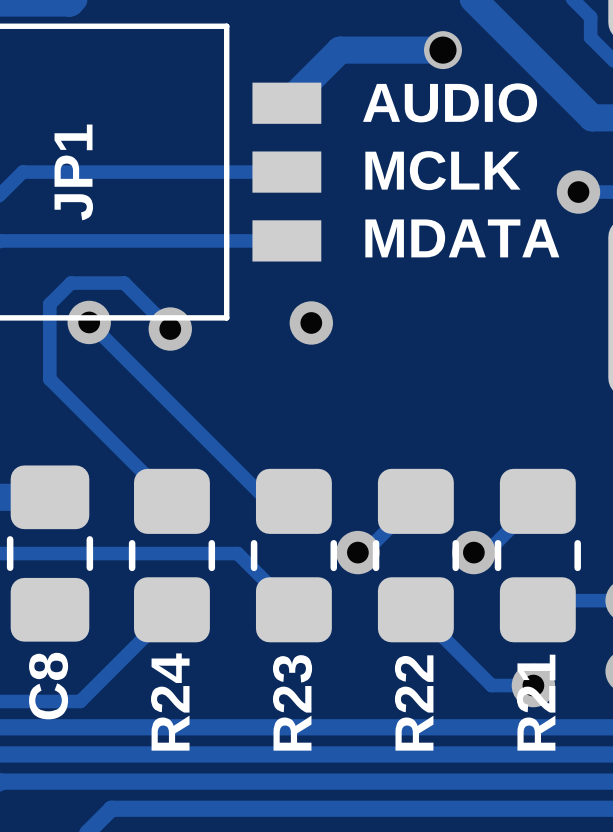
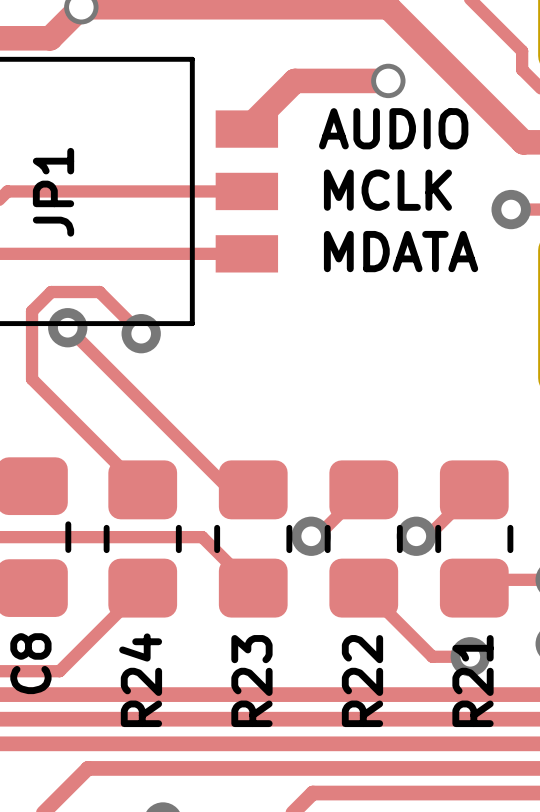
via: (311, 322) -> none

